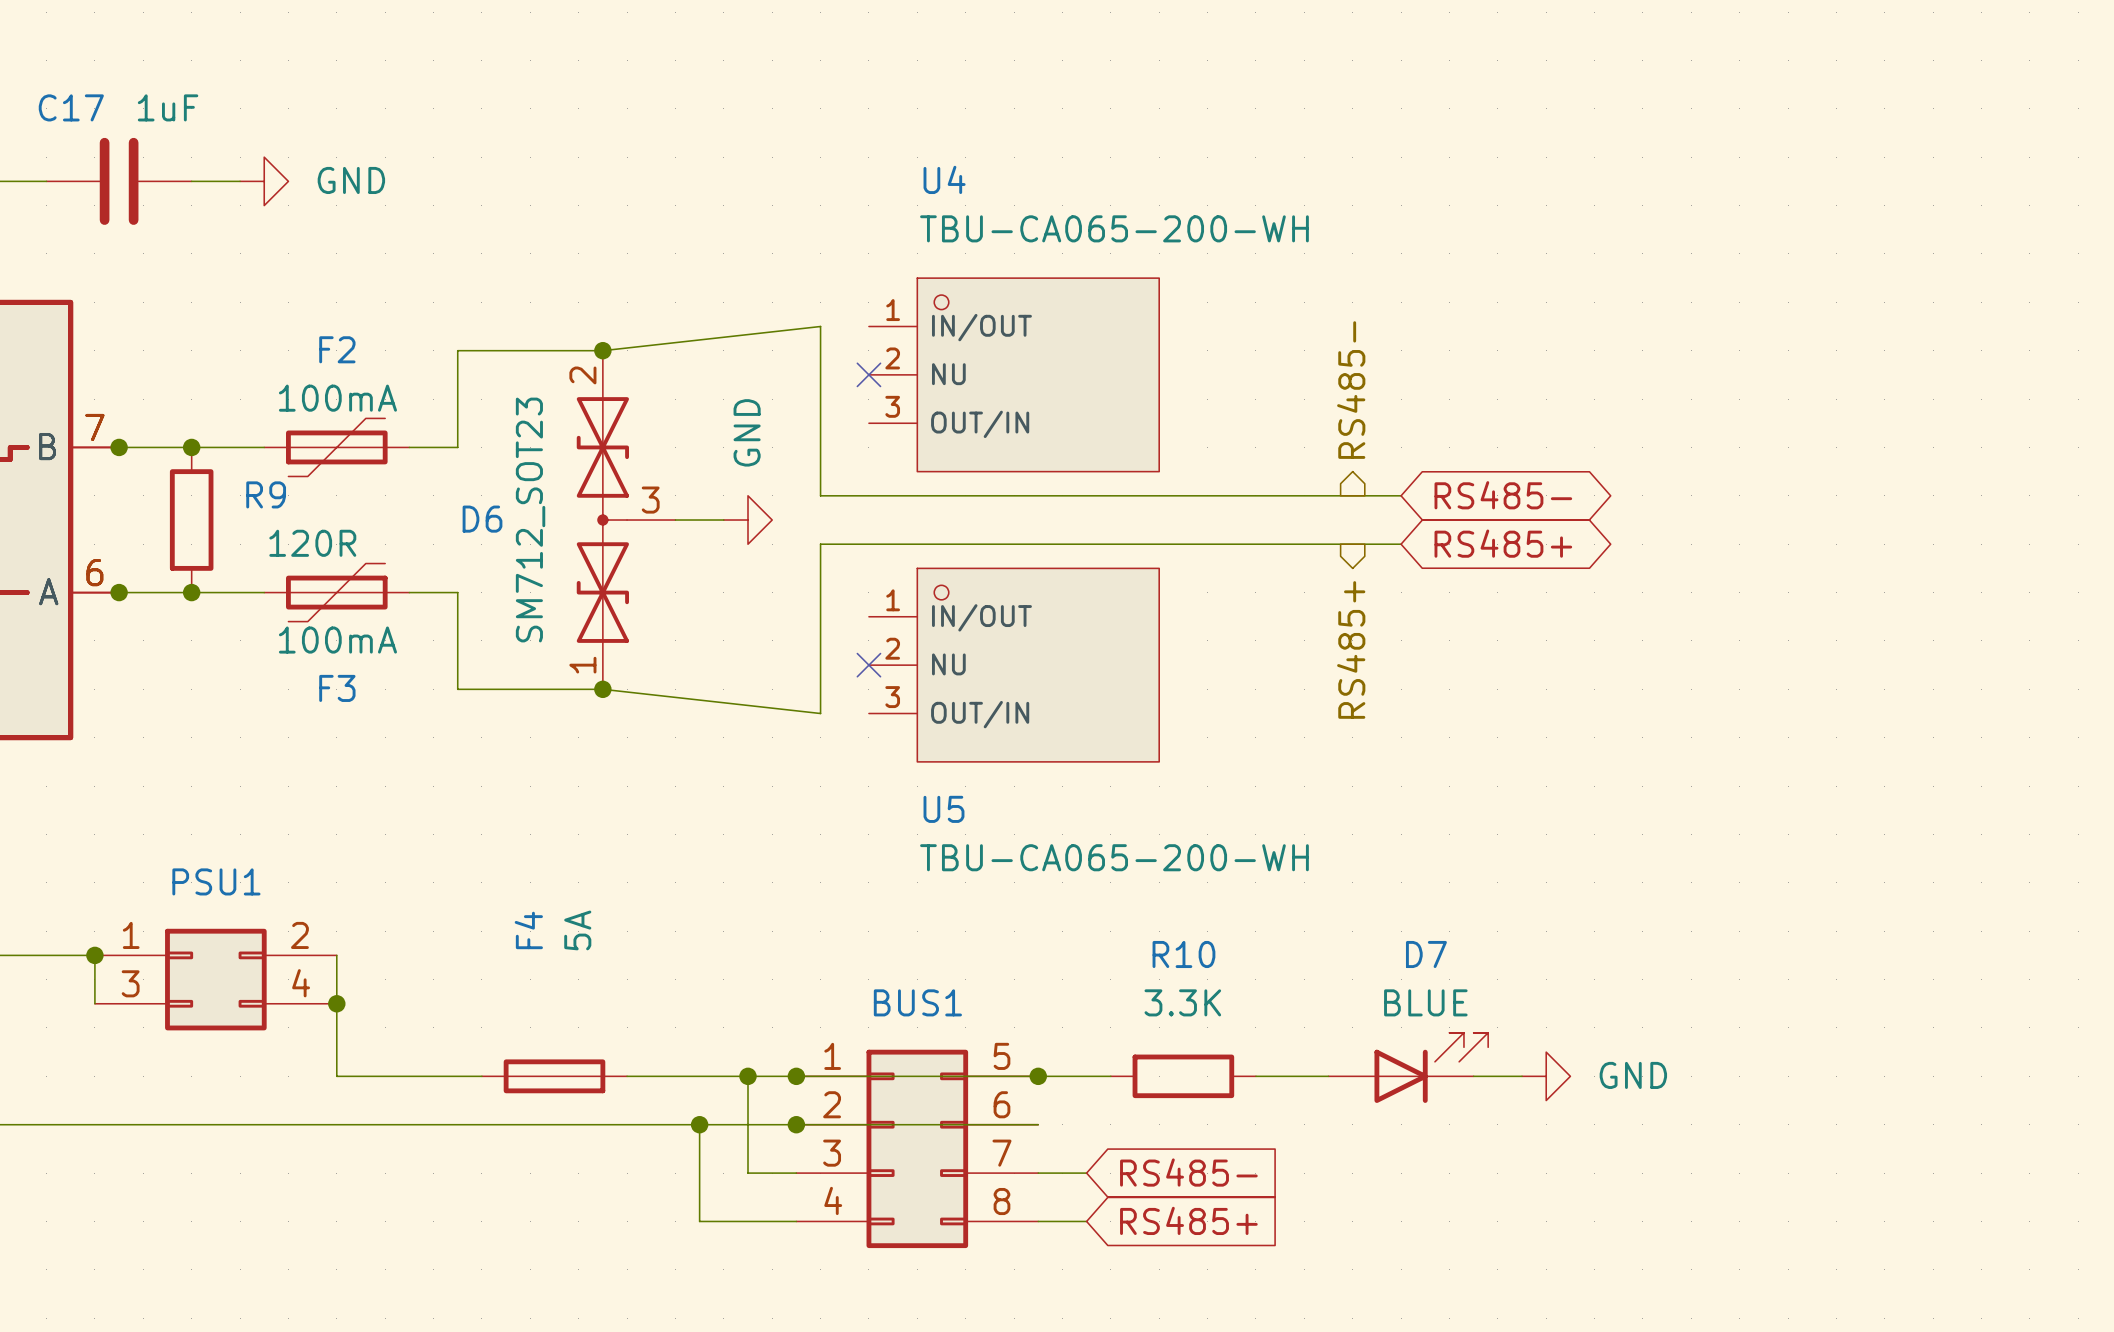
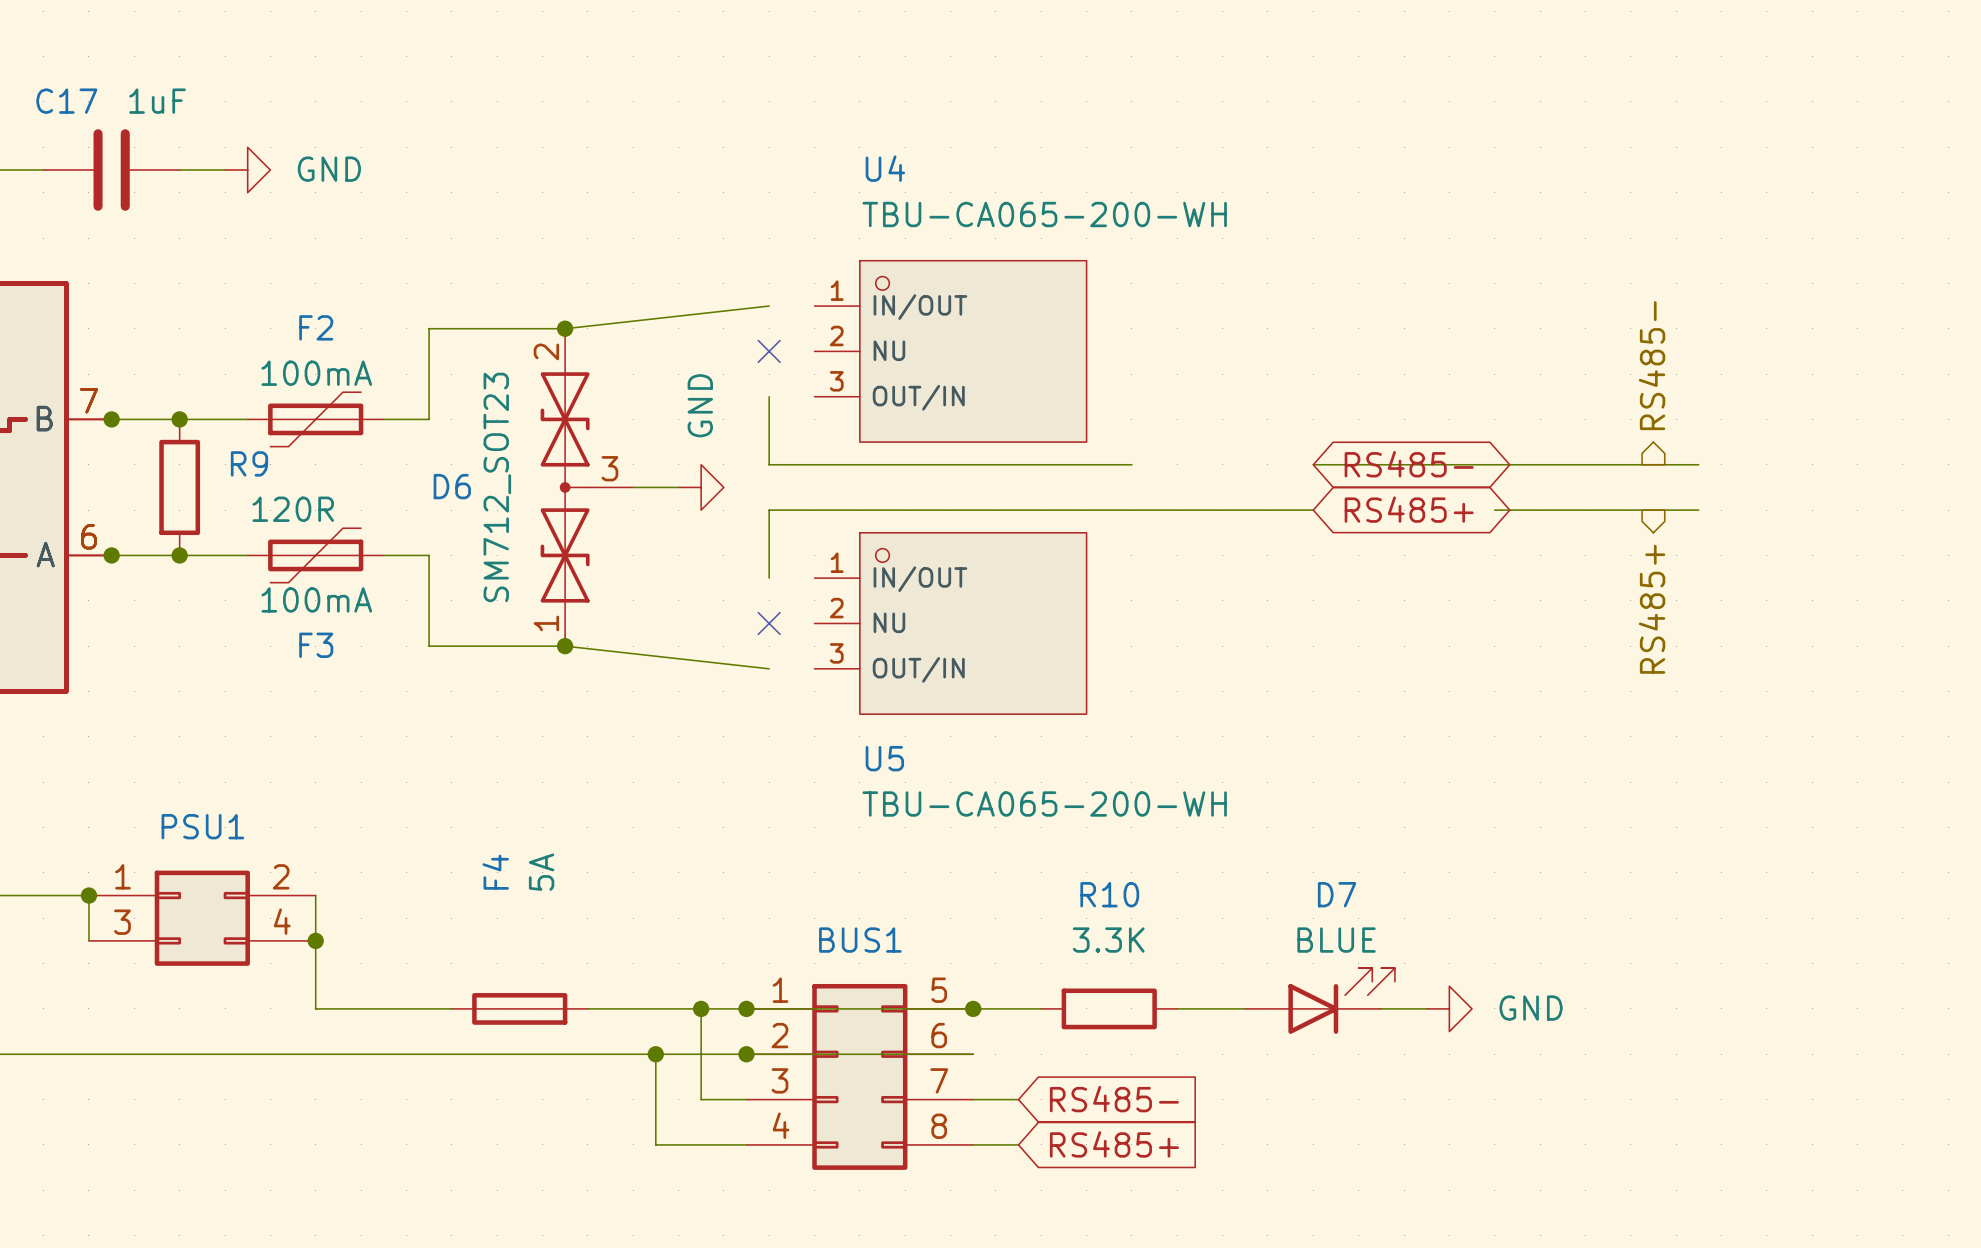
wire: (820, 326) (820, 423) -> none
no-connect mark position: (868, 374) -> (769, 351)
hierarchical label position: RS485- (1351, 390) -> RS485- (1652, 365)
wire: (1207, 495) (1401, 495) -> (1698, 464) (1313, 464)
wire: none -> (1494, 510) (1698, 510)
wire: (820, 616) (820, 713) -> none
hierarchical label position: RS485+ (1351, 649) -> RS485+ (1652, 609)
no-connect mark position: (868, 665) -> (769, 623)

